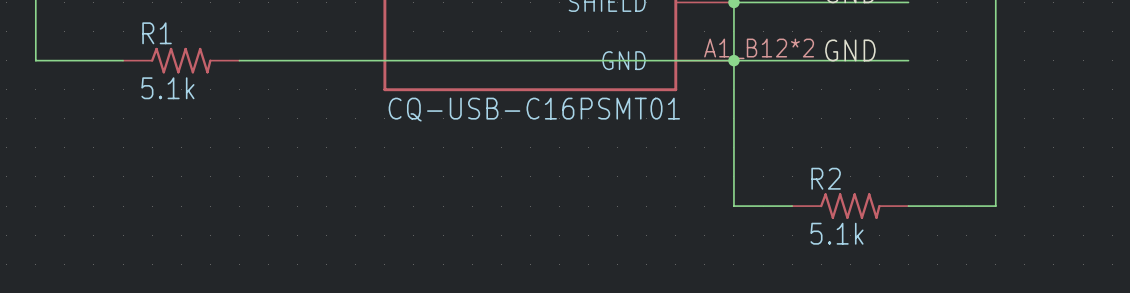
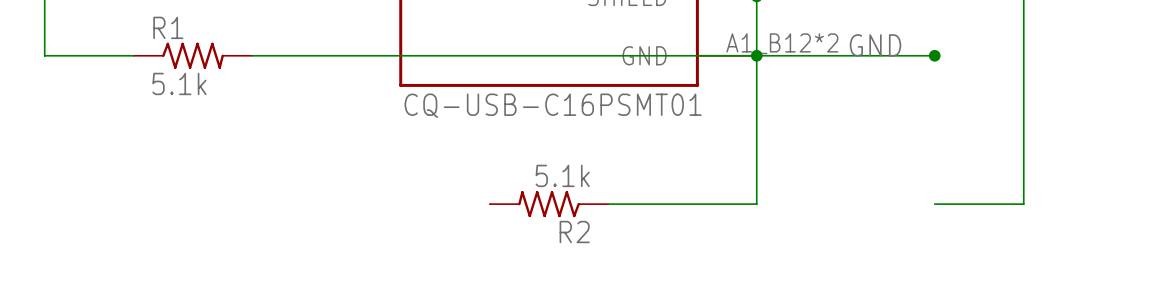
junction: none -> (934, 55)
wire: (733, 206) (792, 206) -> (756, 204) (608, 204)
R2 rotation: 0° (850, 206) -> 180° (549, 204)
R2 position: (850, 206) -> (549, 204)

